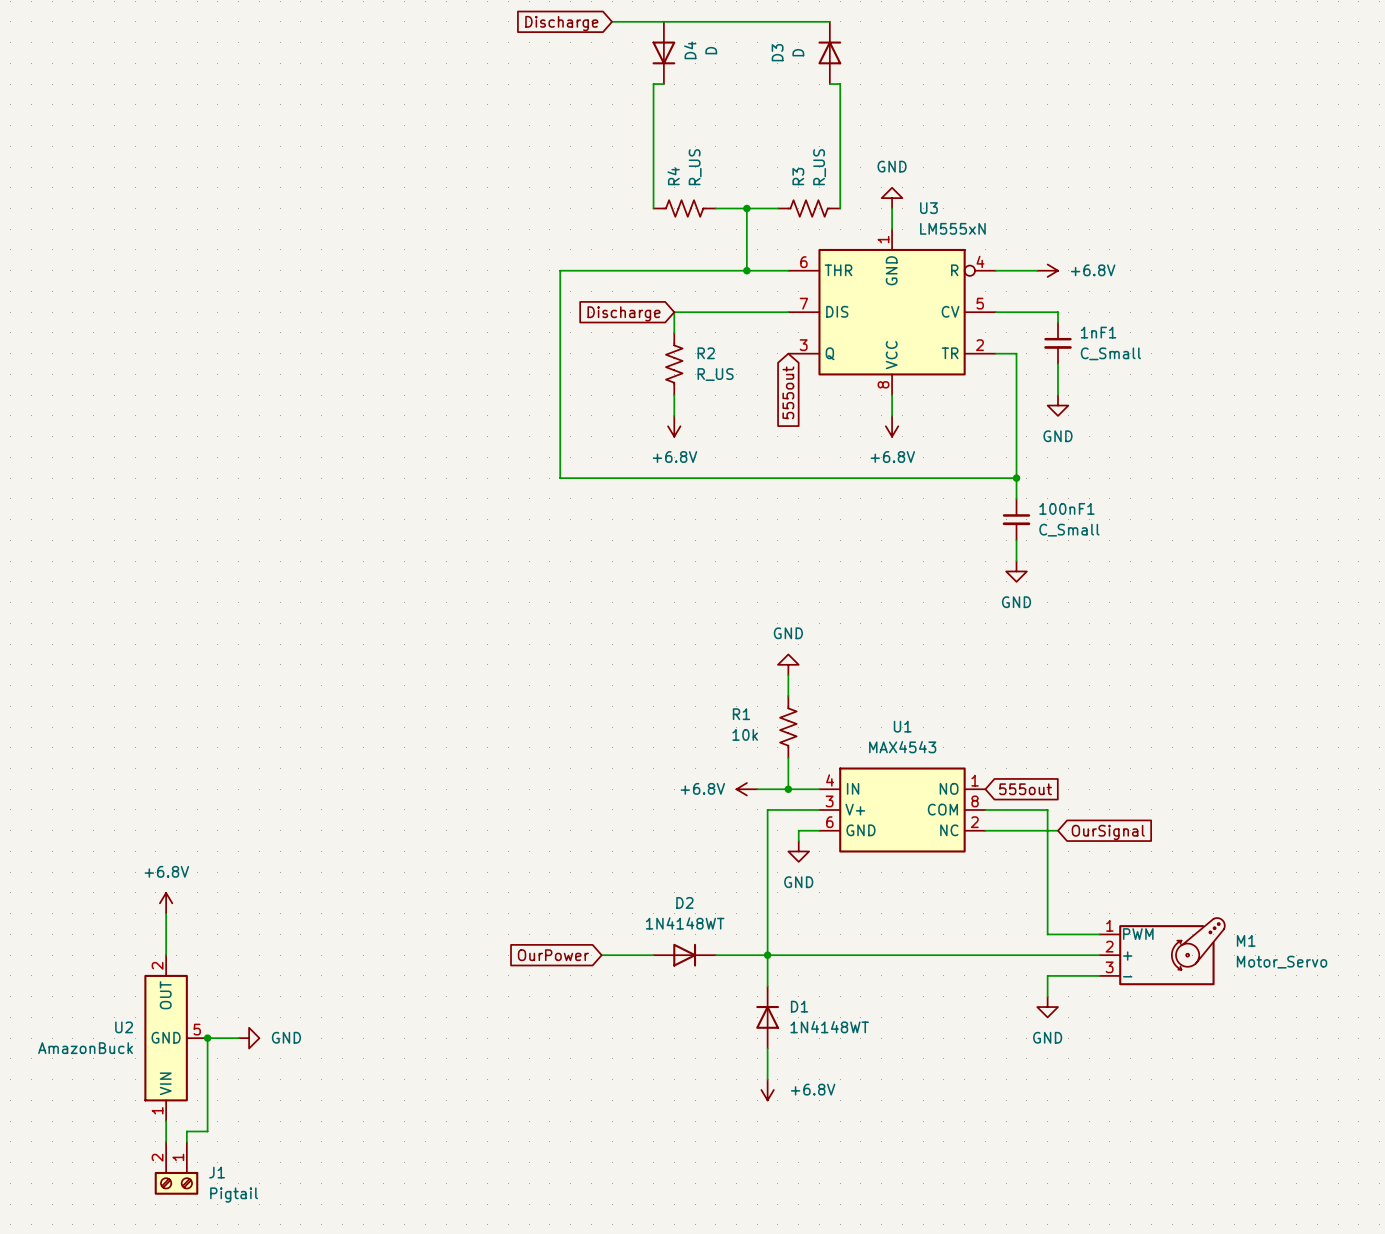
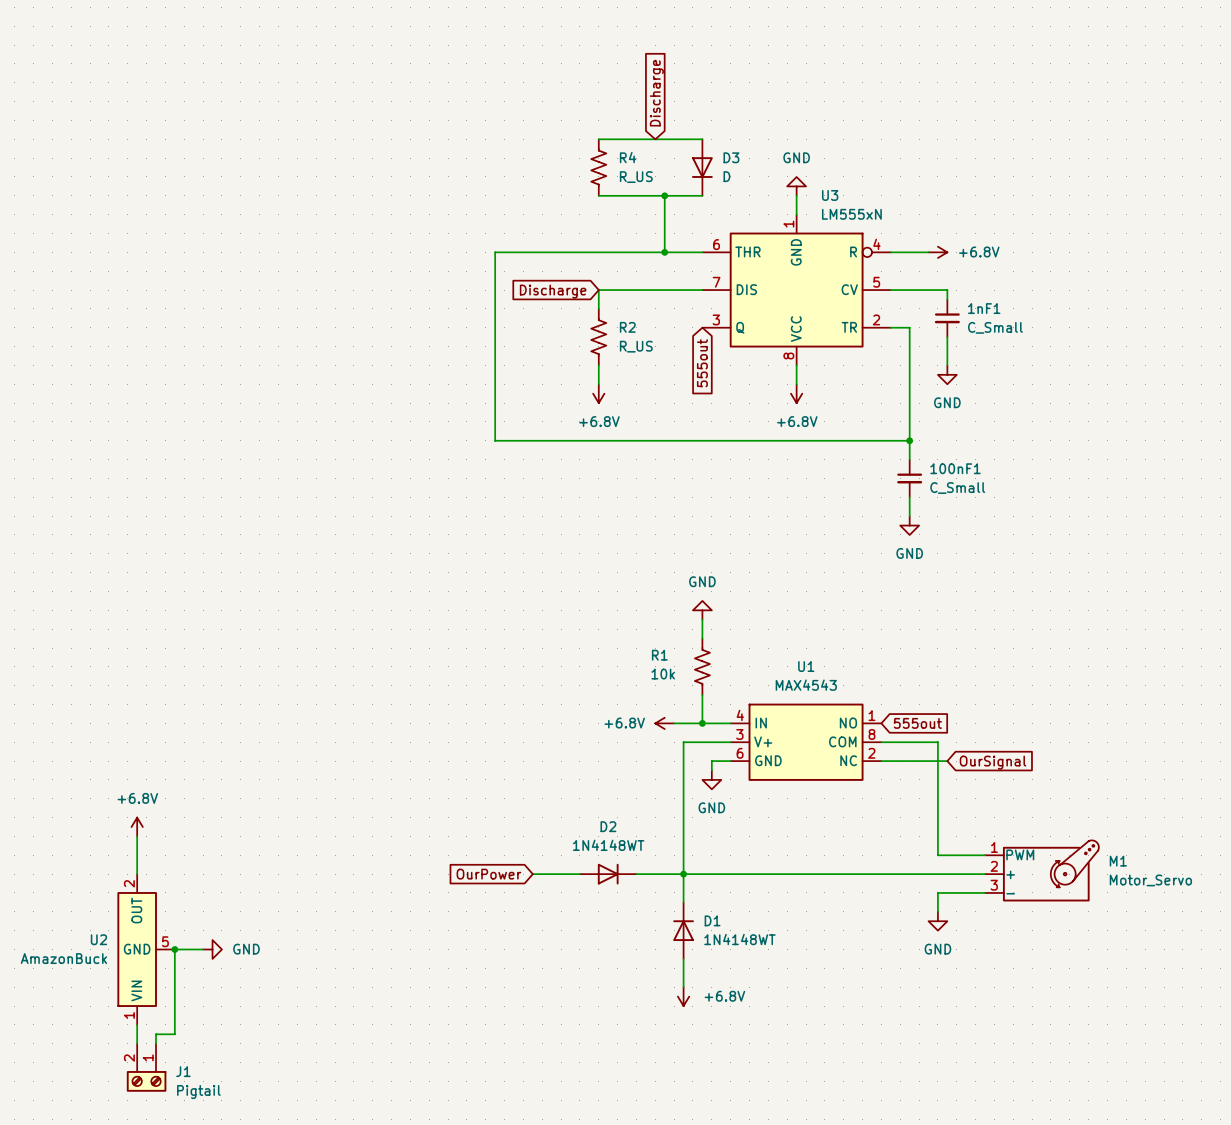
wire: (612, 21) (829, 21) -> none
global label rotation: 0° (561, 23) -> 90° clockwise (656, 93)
global label position: Discharge (561, 23) -> Discharge (656, 93)
D4: D (663, 52) -> none
D3 name position: D3 (777, 52) -> D3 (731, 157)
D3 rotation: 0° (829, 52) -> 180° (702, 167)
D3 position: (829, 52) -> (702, 167)
wire: (663, 84) (653, 84) (653, 208) -> none
wire: (829, 84) (840, 84) (840, 208) -> none
wire: none -> (598, 139) (702, 139)
R4 rotation: 0° (684, 208) -> 90° clockwise (598, 167)
R3: R_US (809, 208) -> none

